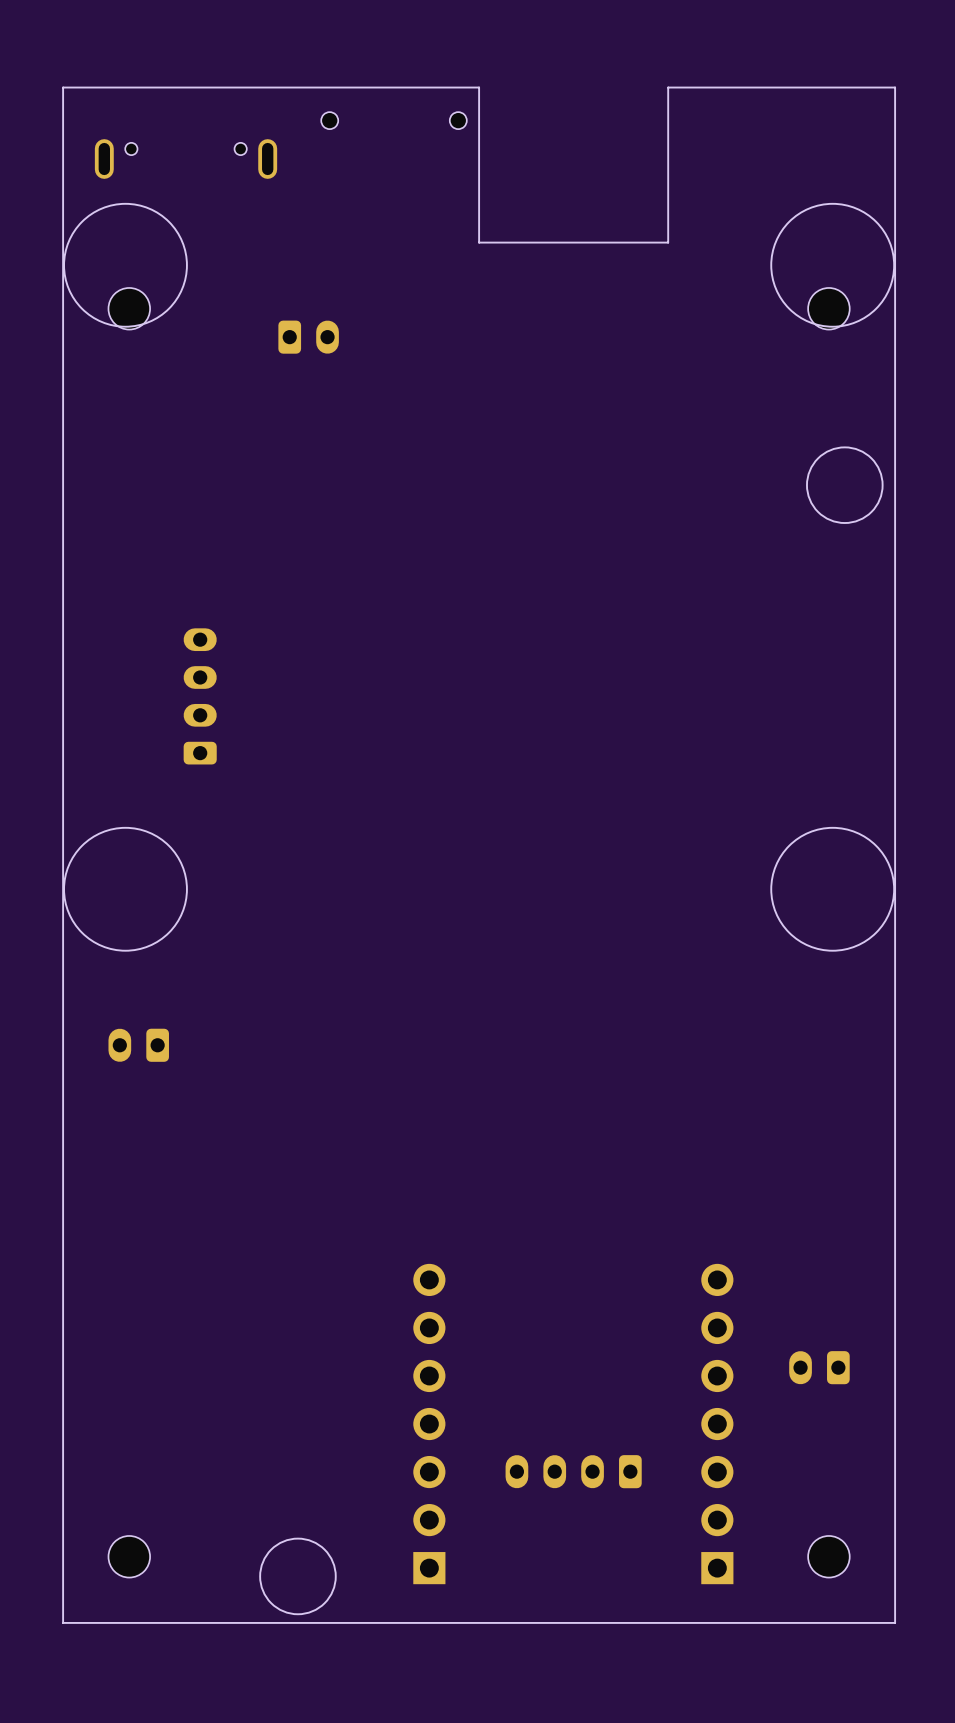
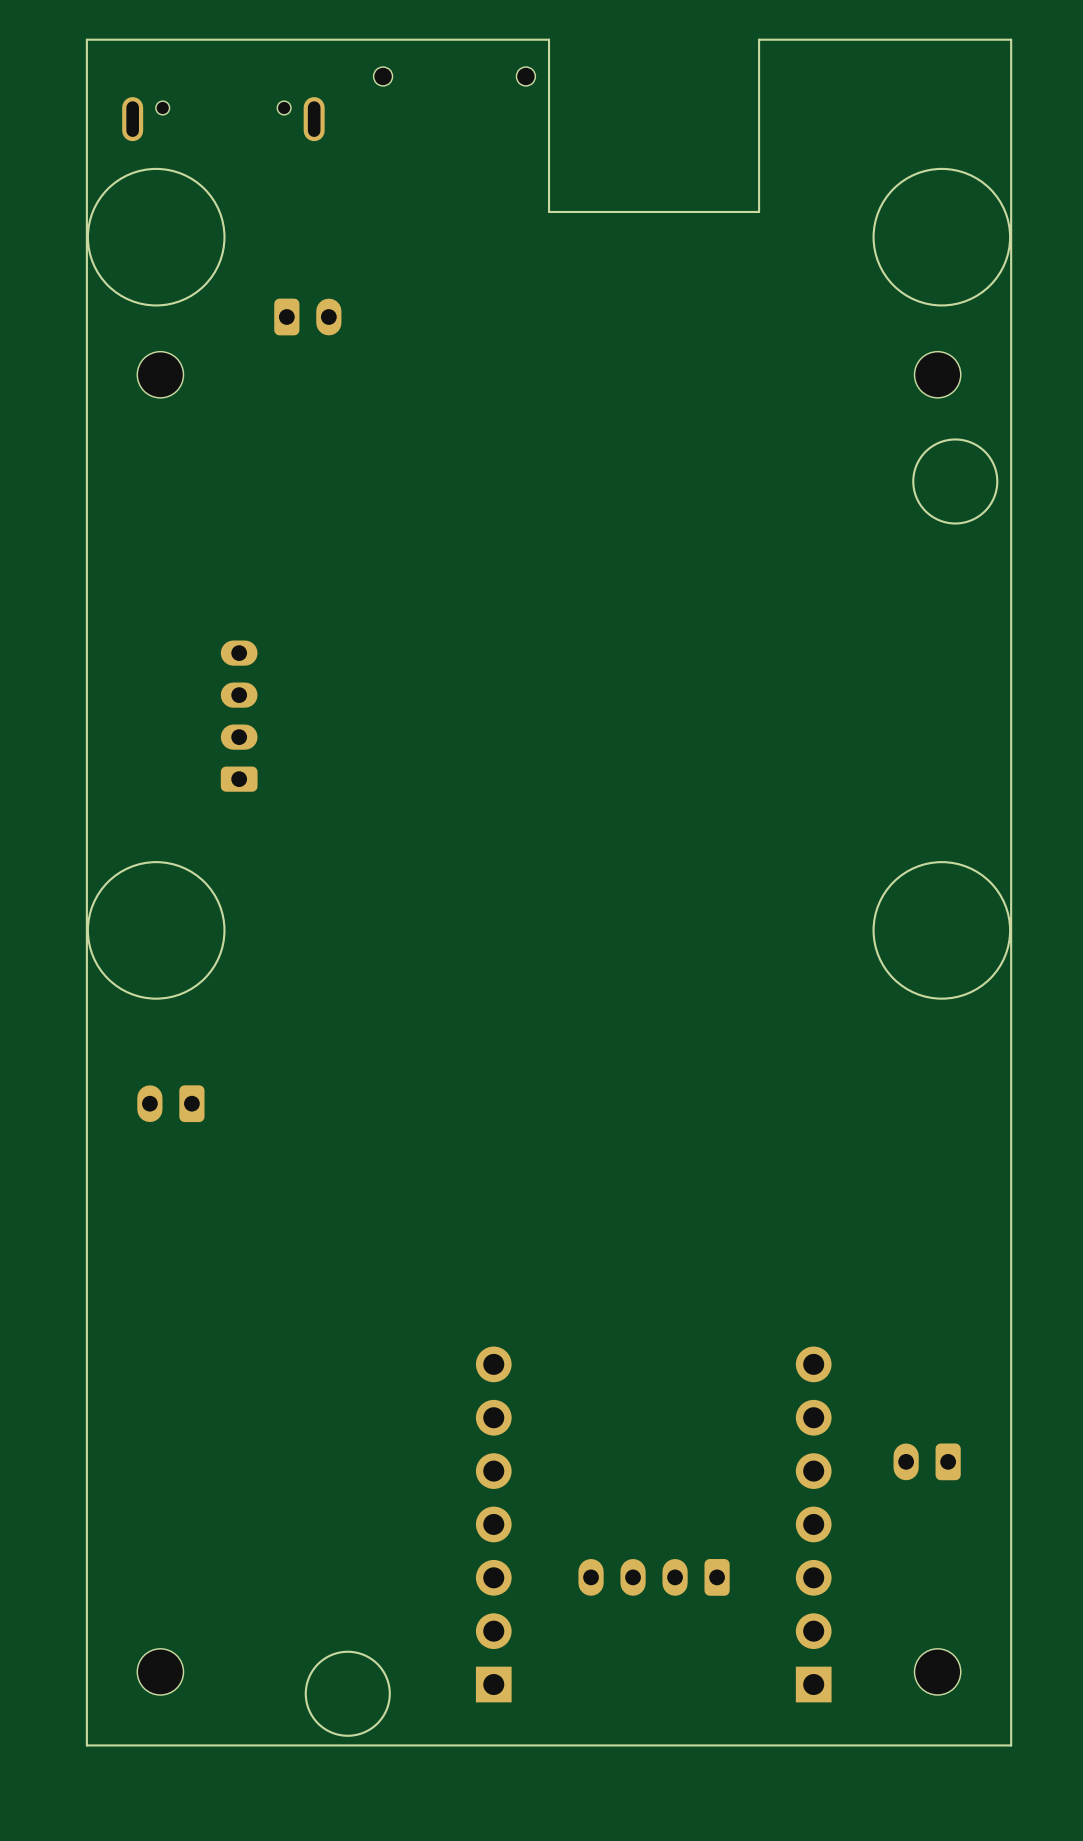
part position: (129, 308) -> (160, 374)
part position: (828, 308) -> (937, 374)
part position: (308, 337) -> (307, 317)

